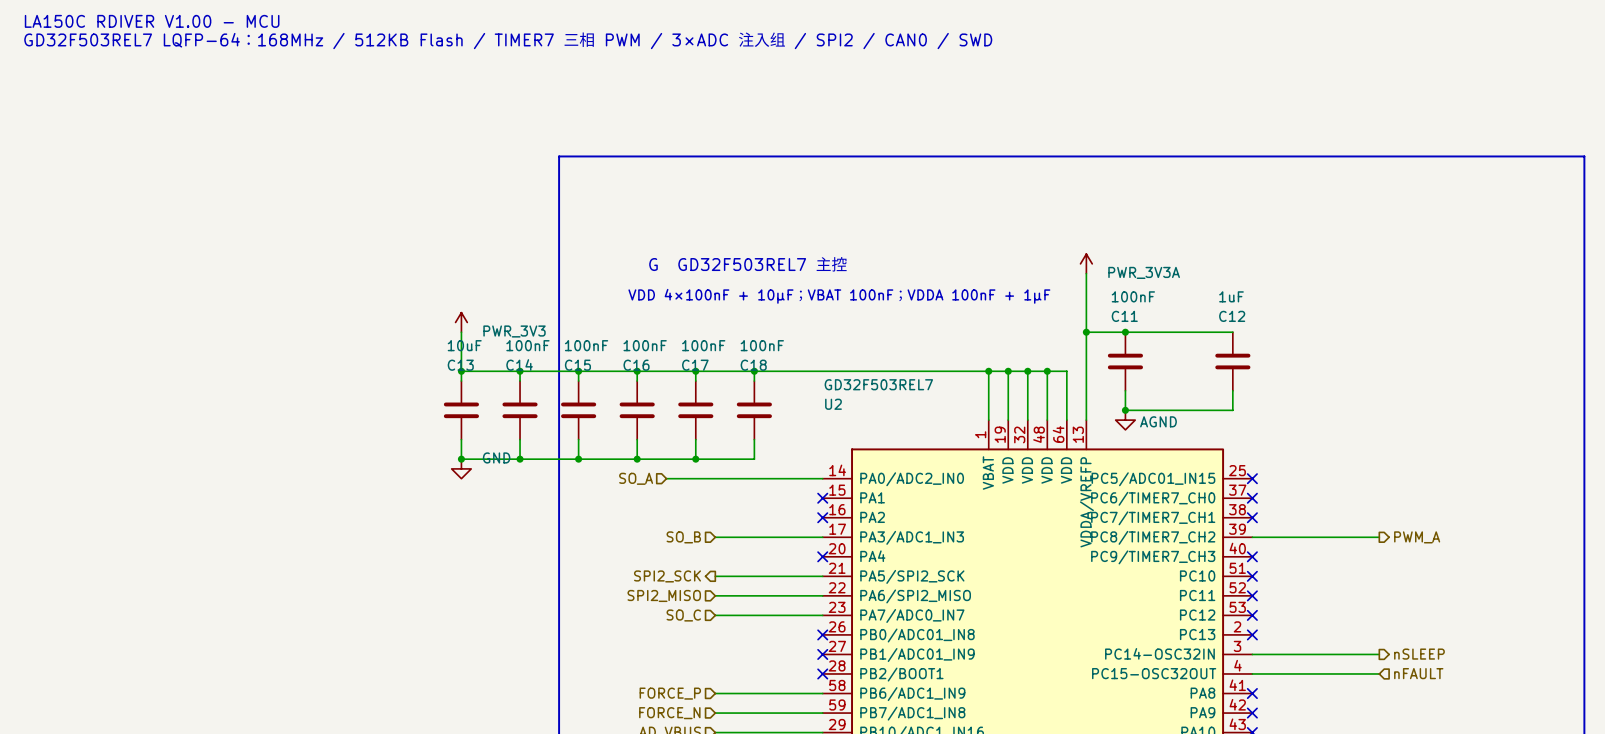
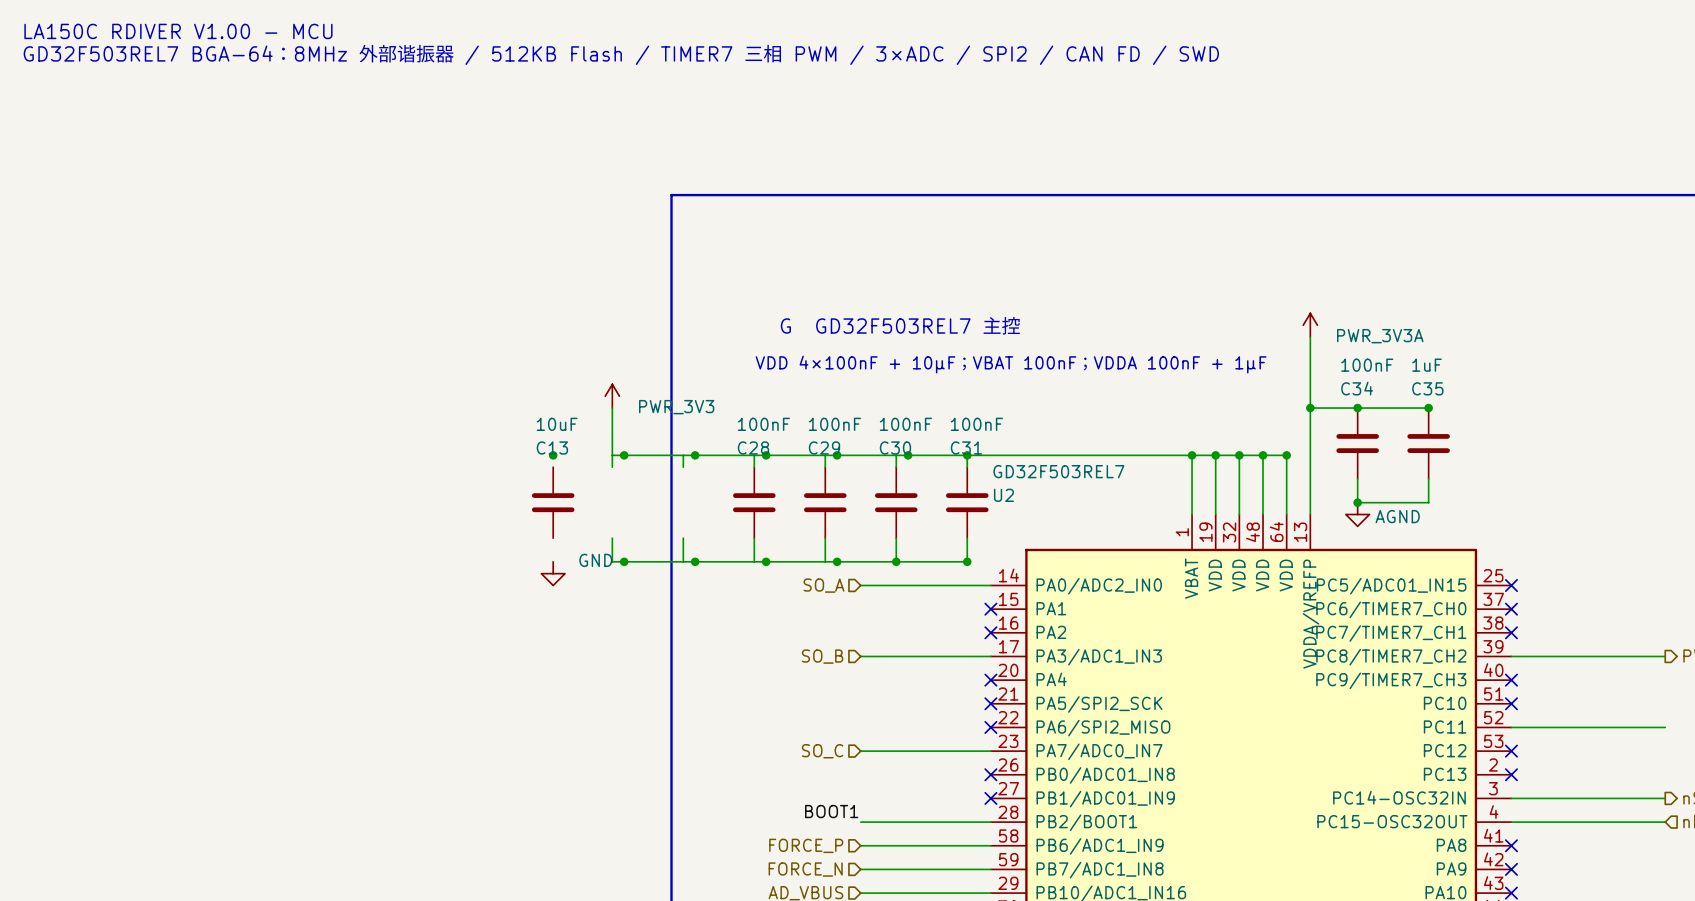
text: GD32F503REL7 LQFP-64：168MHz / 512KB Flash / TIMER7 三相 PWM / 3×ADC 注入组 / SPI2 / CAN0 / SWD (508, 40) -> GD32F503REL7 BGA-64：8MHz 外部谐振器 / 512KB Flash / TIMER7 三相 PWM / 3×ADC / SPI2 / CAN FD / SWD (621, 54)
C11 name: C11 (1124, 316) -> C34 (1357, 388)
power symbol position: PWR_3V3 (461, 322) -> PWR_3V3 (612, 396)
wire: (461, 332) (461, 381) -> (612, 408) (612, 467)
wire: (1184, 332) (1232, 332) -> none
junction: none -> (1428, 408)
C35: none -> 1uF (1428, 443)
C12: 1uF (1232, 361) -> none
wire: (461, 371) (510, 371) -> none
wire: (520, 371) (520, 381) -> (683, 455) (683, 467)
wire: (578, 371) (578, 381) -> (754, 455) (754, 467)
wire: (637, 371) (637, 381) -> (825, 455) (825, 467)
wire: (695, 371) (695, 381) -> (896, 455) (896, 467)
wire: (754, 371) (754, 381) -> (967, 455) (967, 467)
junction: none -> (967, 455)
junction: none -> (1286, 455)
wire: (1232, 390) (1232, 410) (1184, 410) -> (1428, 479) (1428, 502)
C14: 100nF (520, 410) -> none
C15: 100nF (578, 410) -> none
C28: none -> 100nF (754, 502)
C16: 100nF (637, 410) -> none
C29: none -> 100nF (825, 502)
C17: 100nF (695, 410) -> none
C30: none -> 100nF (896, 502)
C18: 100nF (754, 410) -> none
C31: none -> 100nF (967, 502)
wire: (461, 439) (461, 459) (510, 459) -> (612, 538) (612, 561)
wire: (520, 439) (520, 459) -> (683, 538) (683, 561)
wire: (578, 439) (578, 459) -> (754, 538) (754, 561)
wire: (637, 439) (637, 459) -> (825, 538) (825, 561)
wire: (695, 439) (695, 459) -> (896, 538) (896, 561)
wire: (754, 439) (754, 459) -> (967, 538) (967, 561) (908, 561)
junction: (461, 459) -> none
junction: none -> (896, 561)
junction: none -> (967, 561)
hierarchical label position: SO_A (636, 478) -> SO_A (823, 585)
wire: (666, 478) (715, 478) -> none
hierarchical label: SPI2_SCK (667, 576) -> none
wire: (715, 576) (822, 576) -> none
no-connect mark: none -> (990, 703)
hierarchical label: SPI2_MISO (664, 595) -> none
wire: (715, 595) (822, 595) -> (860, 822) (990, 822)
no-connect mark: none -> (990, 727)
wire: none -> (1511, 727) (1665, 727)
no-connect mark: (1252, 595) -> none
label: none -> BOOT1 (831, 811)
no-connect mark: (822, 673) -> none

